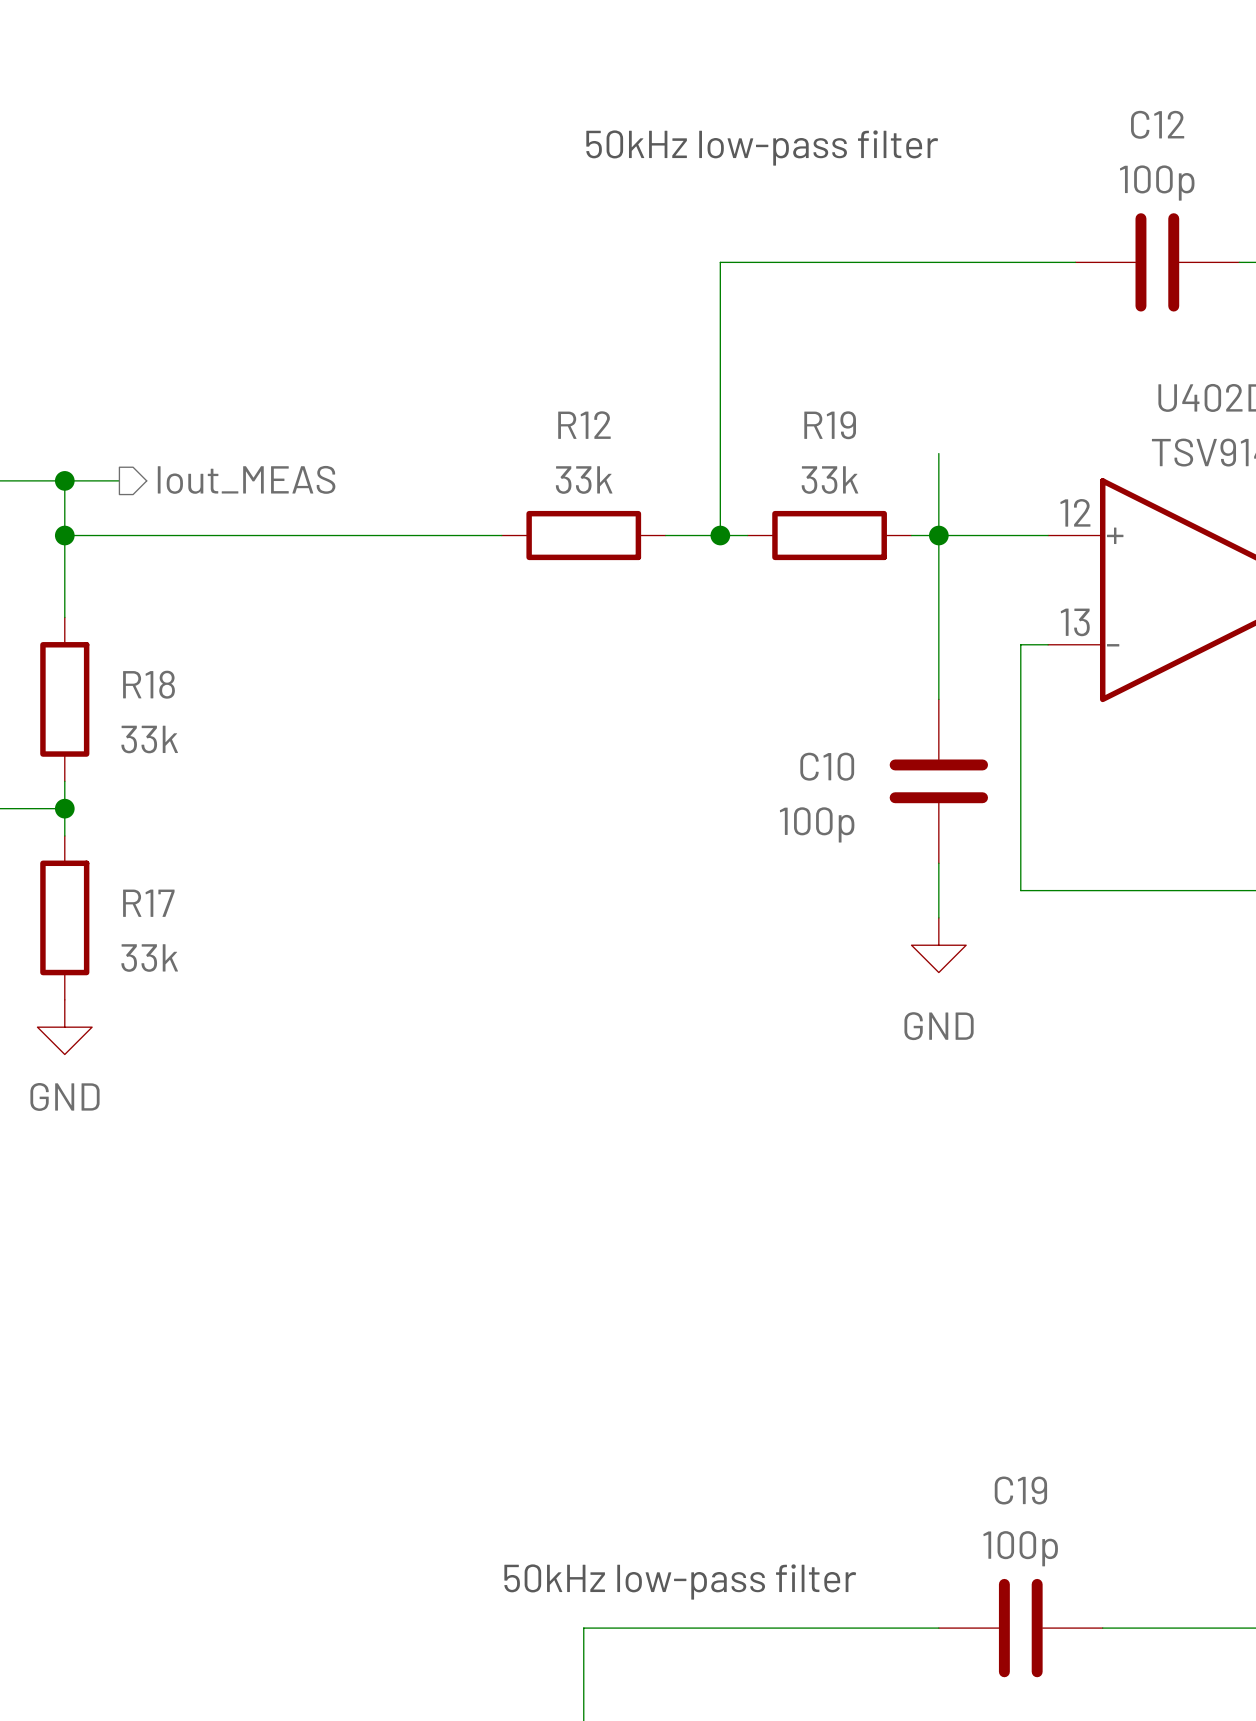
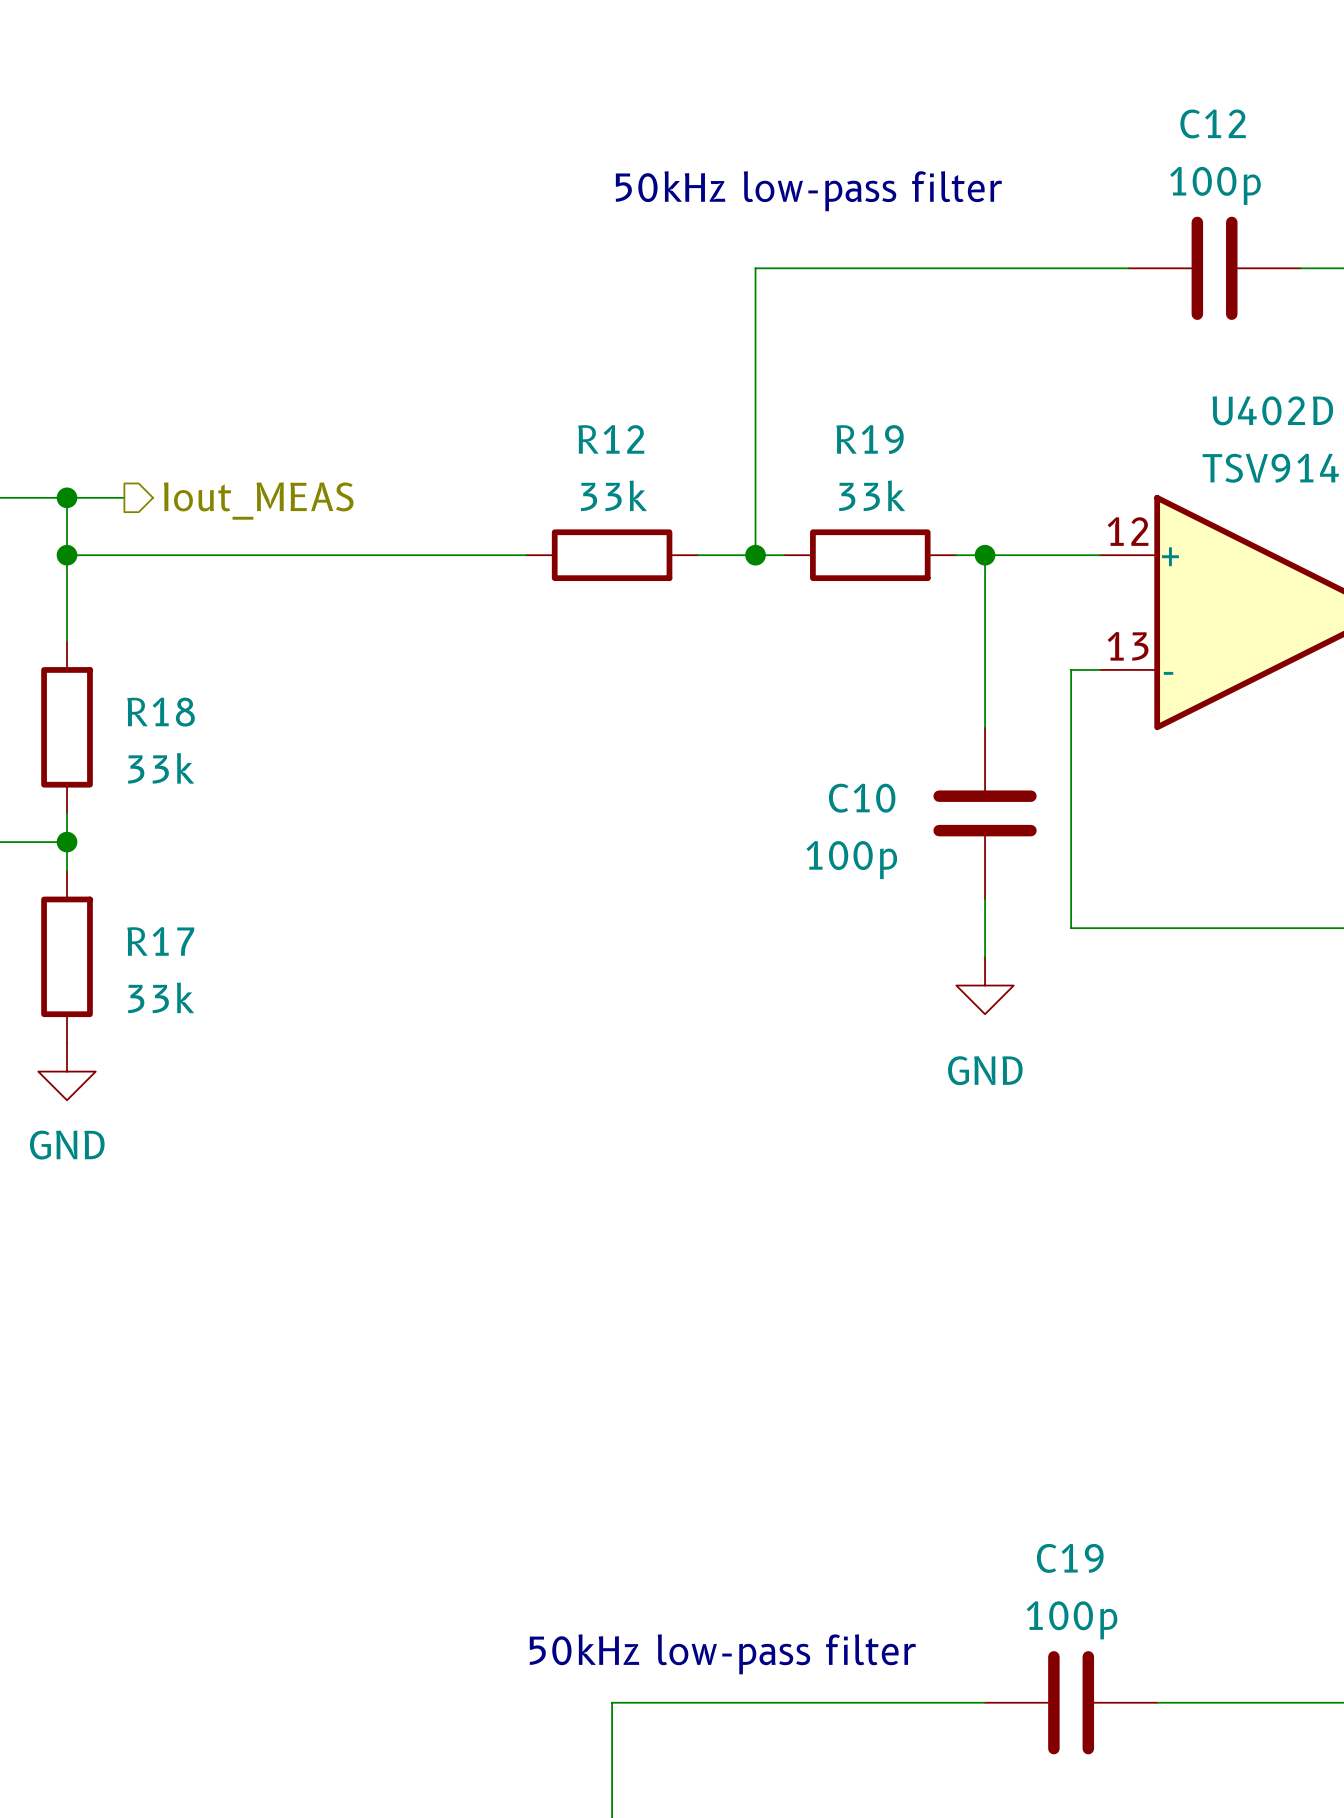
text position: 50kHz low-pass filter (762, 147) -> 50kHz low-pass filter (808, 191)
wire: (938, 453) (938, 535) -> none

